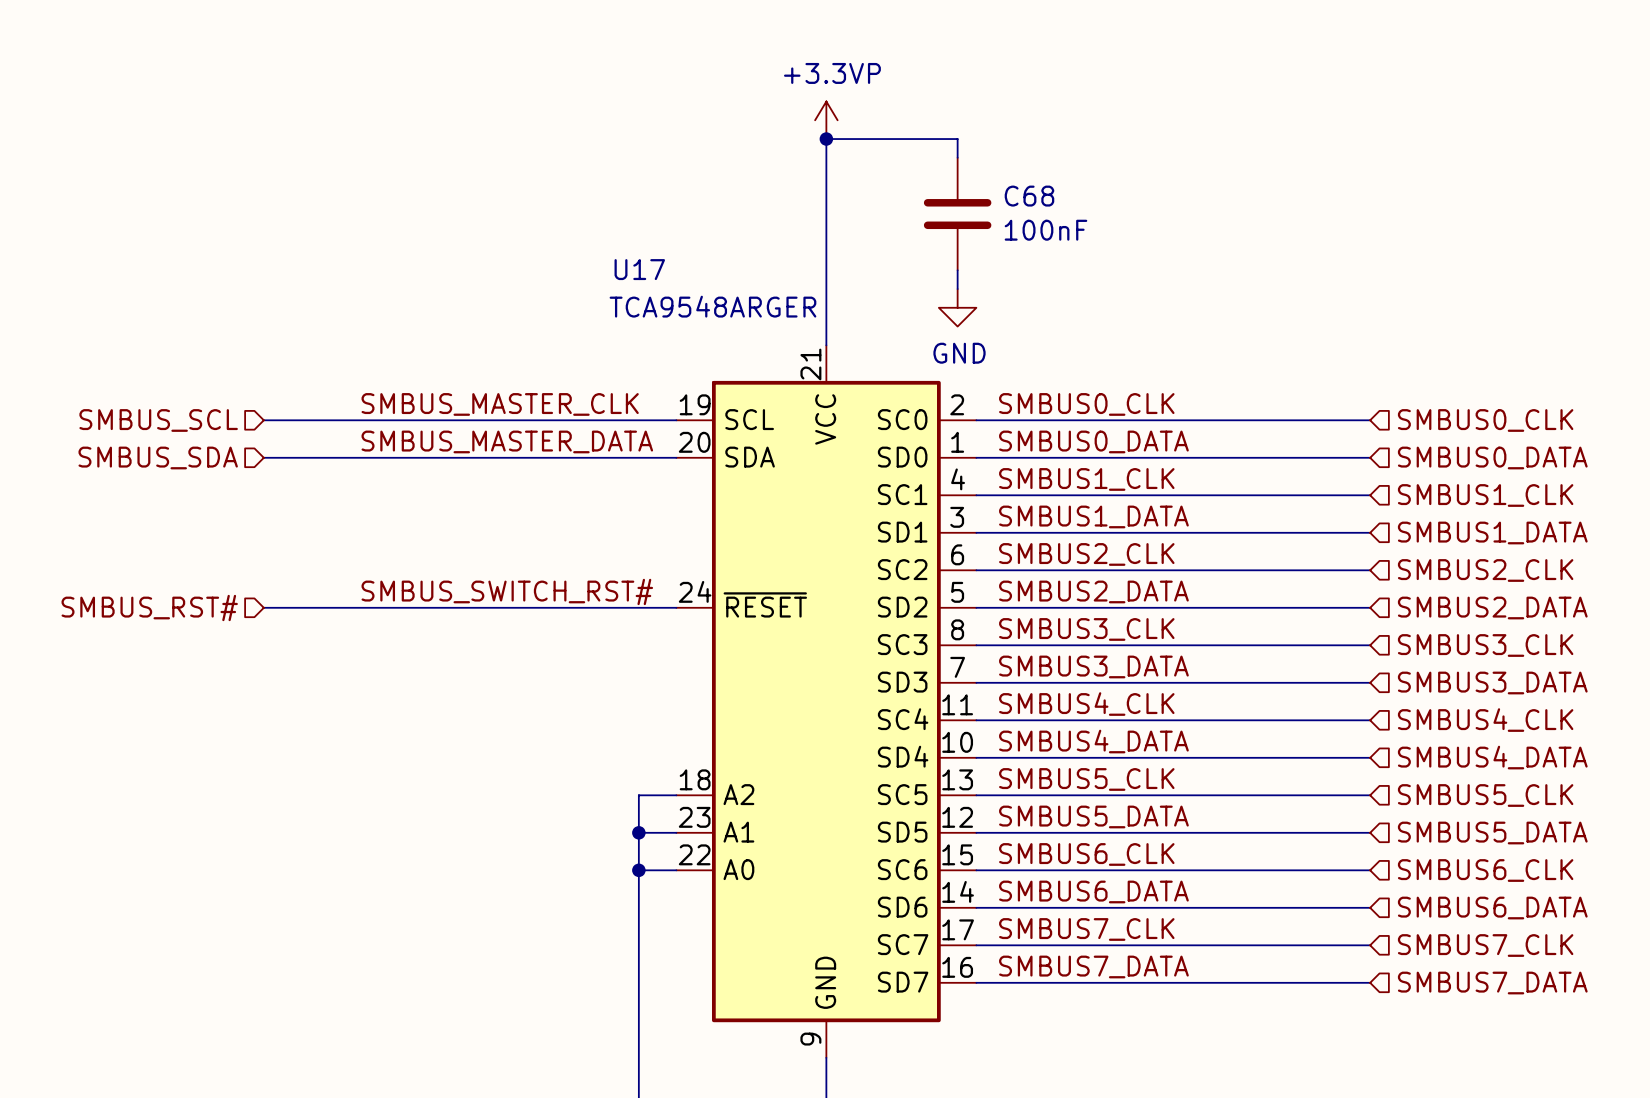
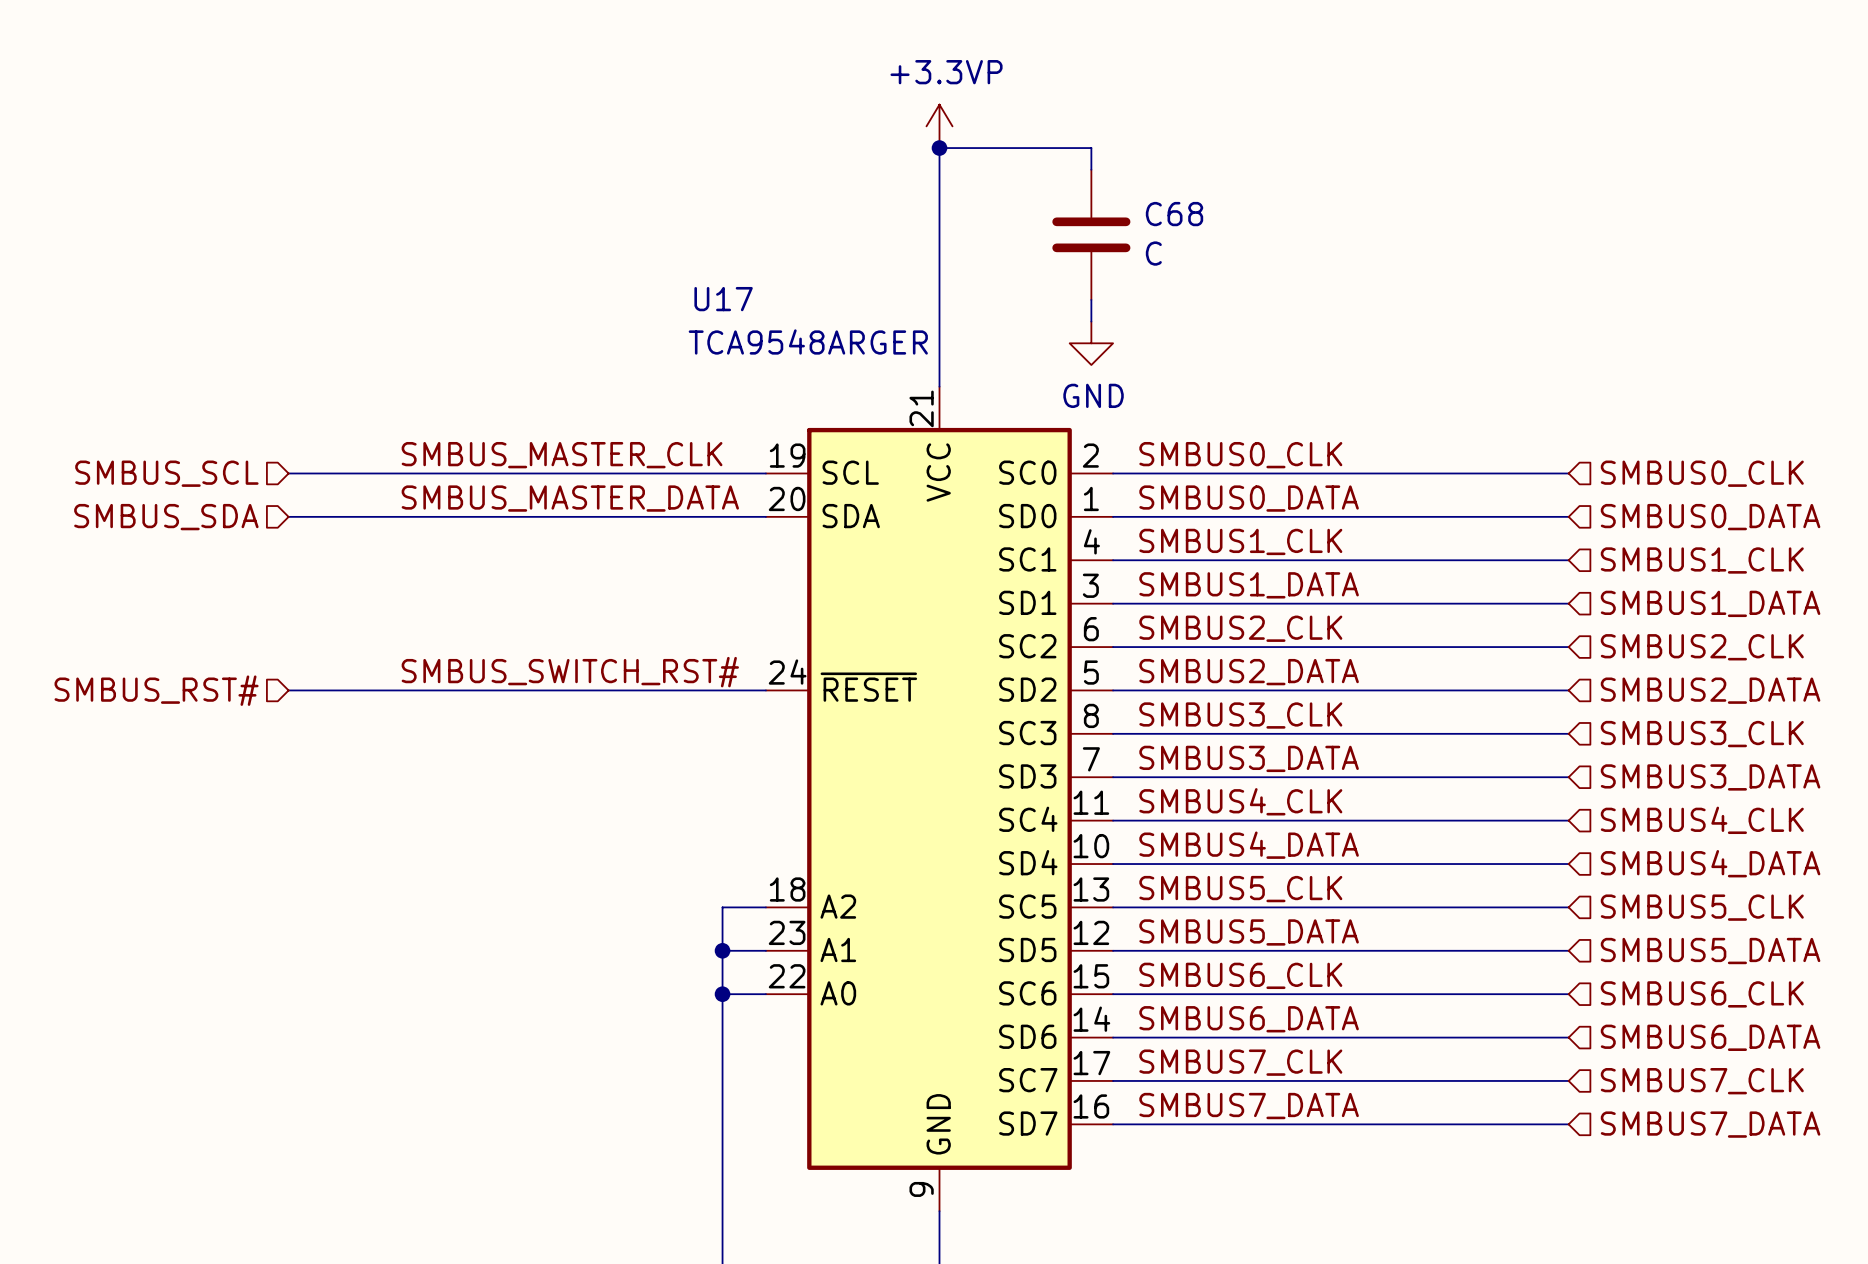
C68 value: 100nF (1045, 230) -> C (1153, 253)

